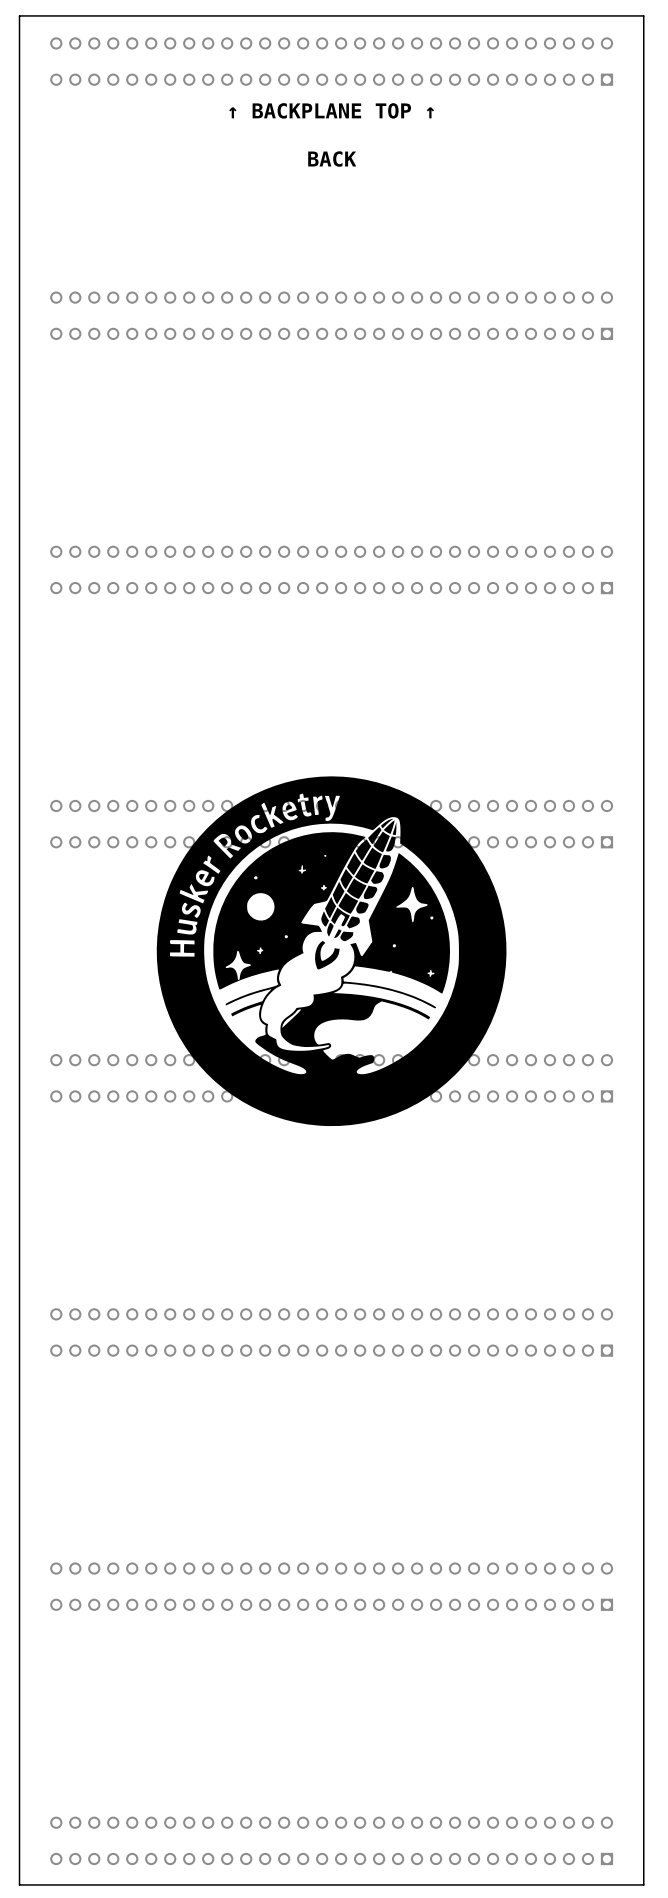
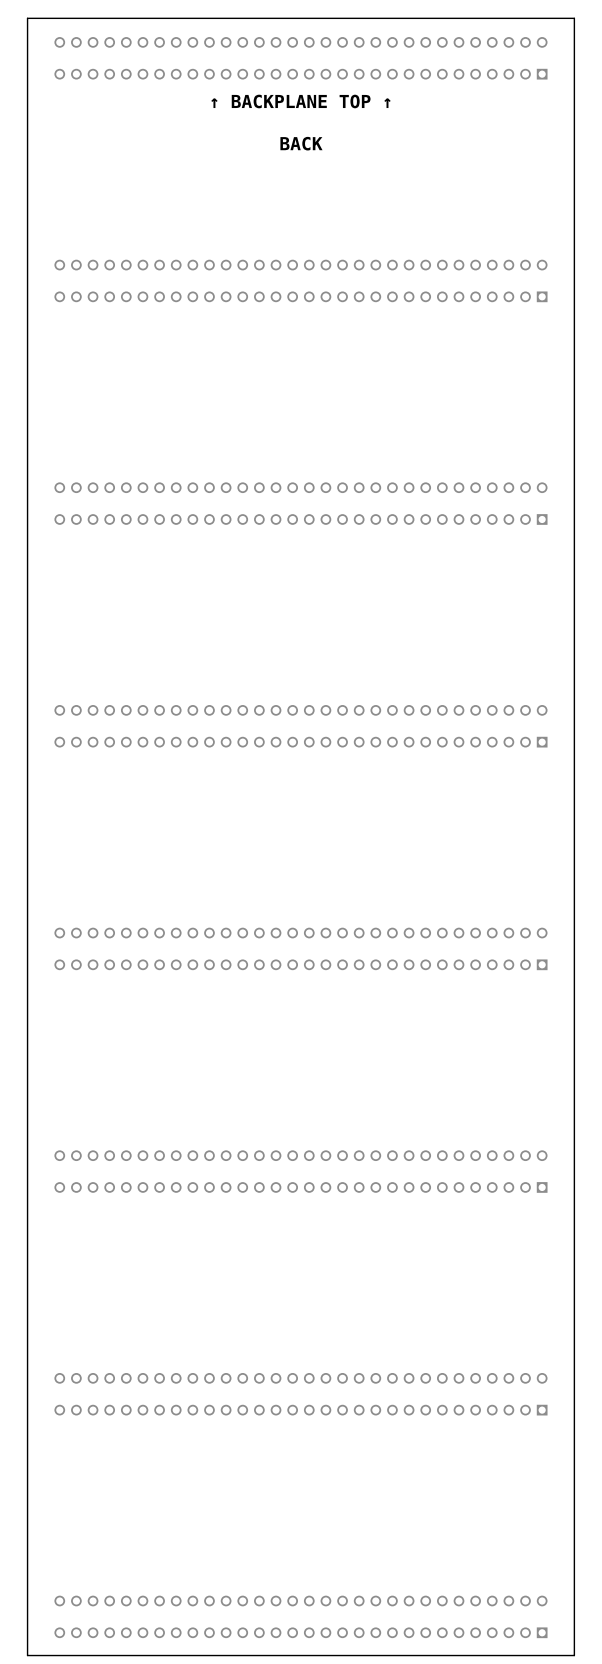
drawing: [156, 776, 507, 1127] -> none

